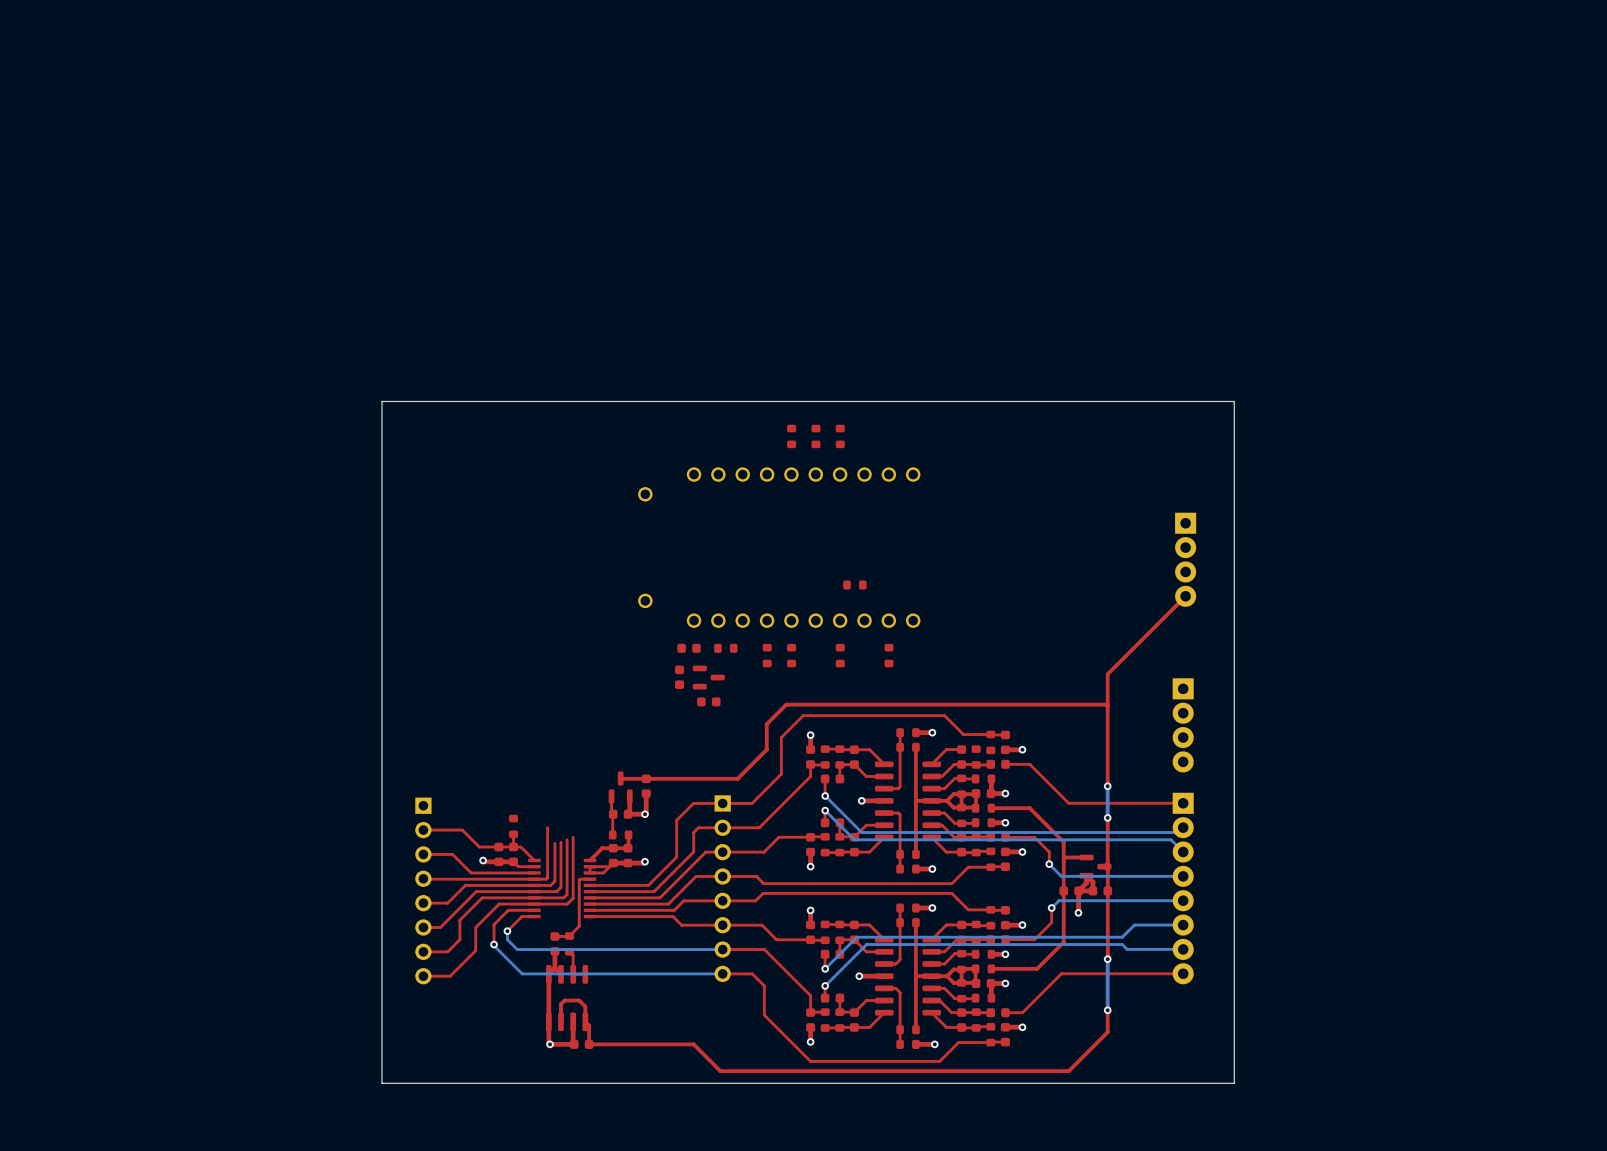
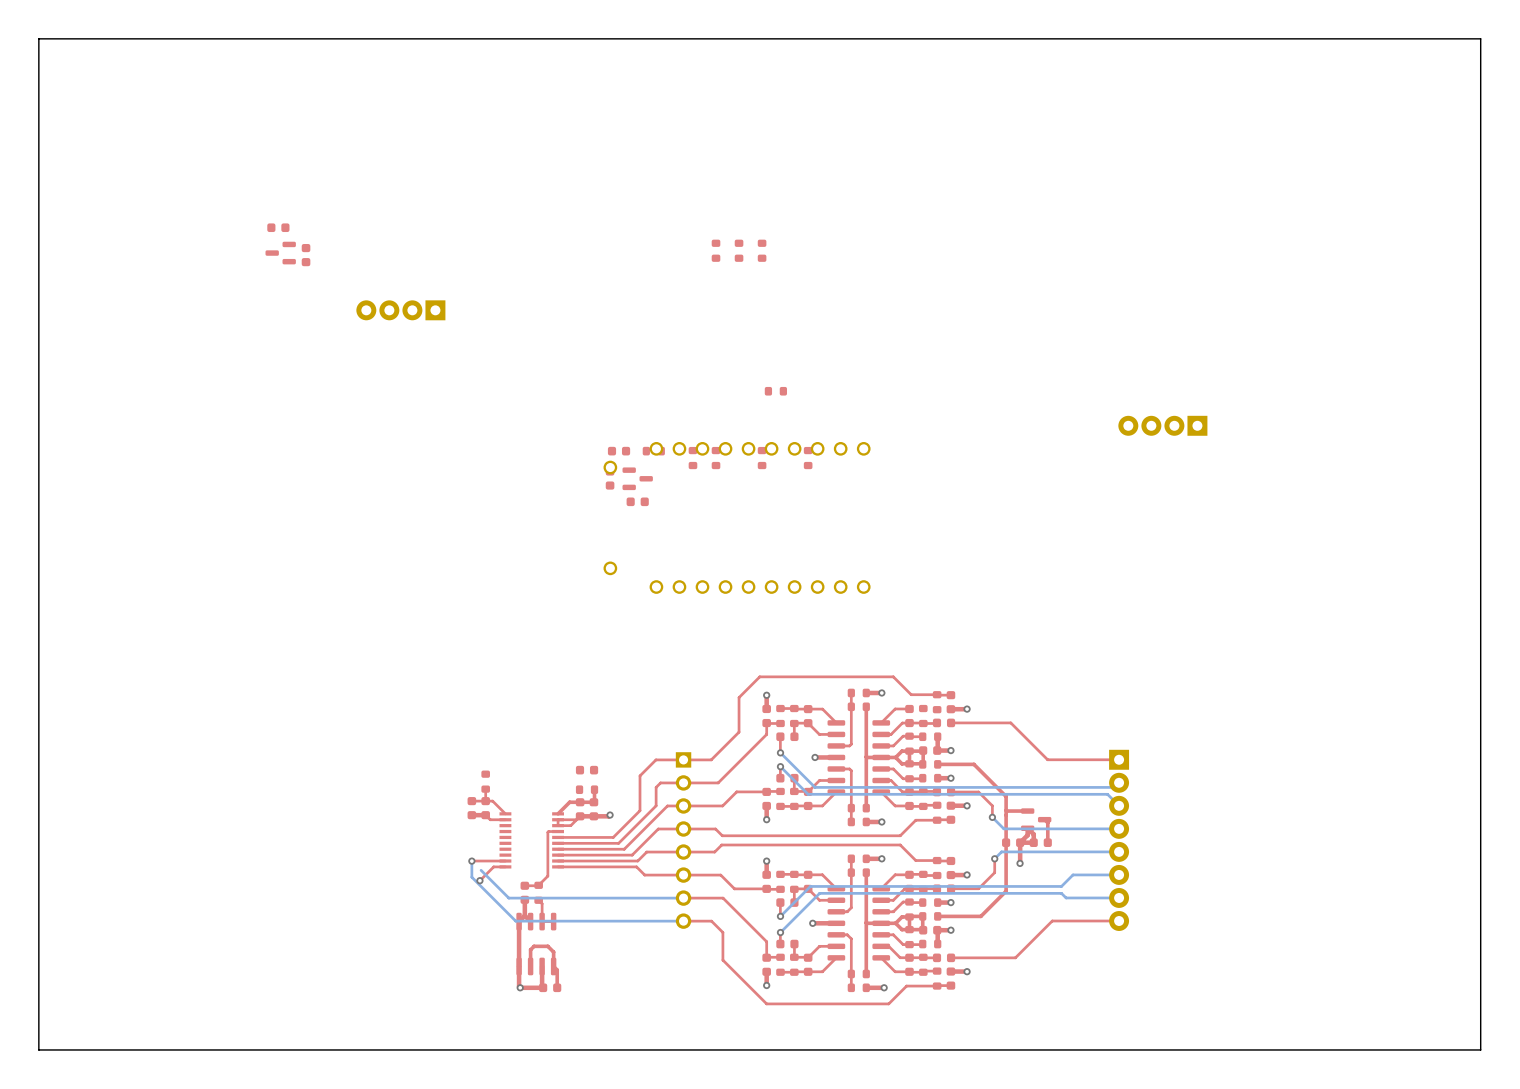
board edge: none -> (1480, 38) (38, 38) (38, 1049) (1480, 1049) (1480, 38)
part: none -> (278, 227)
part: none -> (716, 250)
part: none -> (739, 250)
part: none -> (762, 250)
part: none -> (280, 253)
part: none -> (306, 255)
part: none -> (400, 310)
board edge: (1234, 401) (382, 401) (382, 1083) (1234, 1083) (1234, 401) -> none
part: none -> (775, 391)
part: (791, 436) -> none
part: (815, 436) -> none
part: (840, 436) -> none
part: none -> (619, 451)
part: none -> (653, 451)
part: none -> (692, 458)
part: none -> (716, 458)
part: none -> (762, 458)
part: none -> (808, 458)
part: none -> (610, 478)
part: none -> (637, 478)
part: none -> (637, 501)
part rotation: 0° (1185, 559) -> 90° clockwise (1162, 425)
part position: (1185, 559) -> (1162, 425)
part: (854, 584) -> none
top track: (1185, 596) (1107, 674) (1107, 786) -> none
part: (689, 648) -> none
part: (725, 648) -> none
part: (767, 655) -> none
part: (791, 655) -> none
part: (840, 655) -> none
part: (889, 655) -> none
part: (679, 677) -> none
part: (708, 677) -> none
part: (708, 701) -> none
top track: (1107, 705) (786, 704) (766, 724) (766, 749) (737, 778) (620, 778) -> none
part: (1183, 725) -> none
top track: (1029, 764) (1068, 803) (1107, 803) -> (973, 722) (1010, 722) (1047, 759)
part: (646, 786) -> none
bottom track: (1107, 786) (1107, 817) -> none
via: (1107, 786) -> none
part: (620, 787) -> none
top track: (646, 793) (645, 814) (628, 814) (629, 812) (629, 796) -> none
top track: (611, 796) (612, 834) -> none
via: (645, 814) -> none
top track: (1107, 817) (1107, 863) (1104, 866) -> none
via: (1107, 817) -> none
top track: (547, 827) (547, 877) (545, 879) (423, 878) -> none
top track: (423, 830) (462, 830) (479, 847) (498, 847) -> none
top track: (573, 837) (573, 898) (567, 904) (499, 904) (475, 927) (475, 950) (450, 976) (423, 976) -> none
top track: (567, 839) (567, 894) (563, 897) (482, 897) (459, 920) (459, 939) (447, 951) (423, 951) -> none
top track: (560, 842) (560, 887) (556, 891) (476, 891) (440, 927) (423, 927) -> none
top track: (554, 843) (554, 881) (550, 885) (465, 885) (447, 903) (423, 903) -> none
top track: (423, 854) (452, 854) (471, 872) (534, 872) -> none
top track: (483, 860) (498, 861) -> none
via: (483, 860) -> none
part: (423, 890) -> none
top track: (1107, 890) (1107, 959) -> none
via: none -> (471, 861)
top track: (508, 910) (494, 924) (494, 944) -> (480, 861) (471, 861)
bottom track: (507, 931) (507, 939) (517, 949) (538, 949) -> (481, 870) (508, 898)
bottom track: (494, 944) (522, 973) (545, 973) -> (471, 861) (471, 877) (515, 921)
via: (494, 944) -> none
bottom track: (1107, 959) (1107, 1010) -> none
via: (1107, 959) -> none
top track: (1112, 973) (1061, 973) (1022, 1012) -> (1052, 921) (1015, 957) (967, 957)
top track: (1107, 1010) (1107, 1032) (1068, 1071) (720, 1071) (693, 1044) (589, 1044) -> none
via: (1107, 1010) -> none

